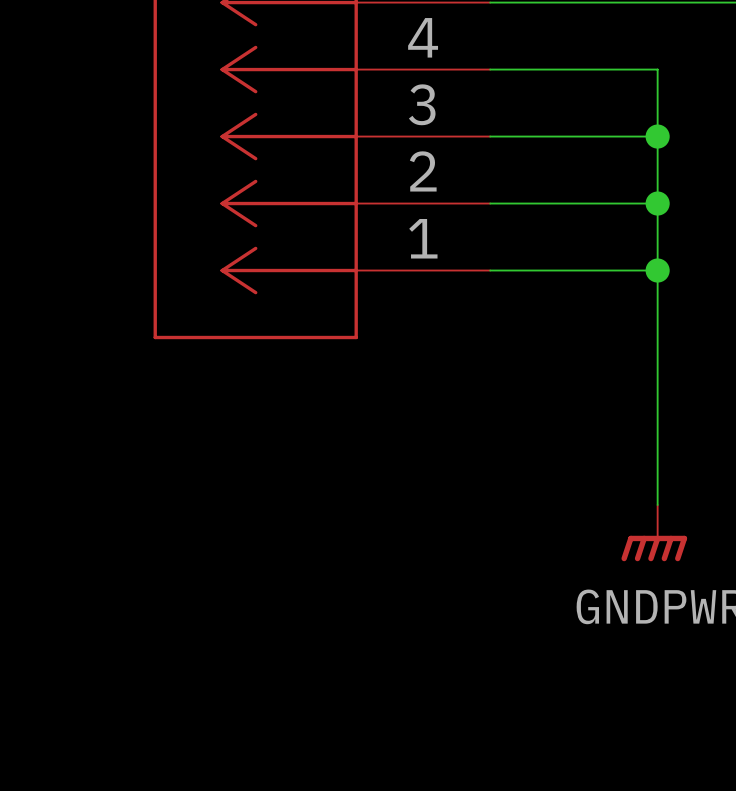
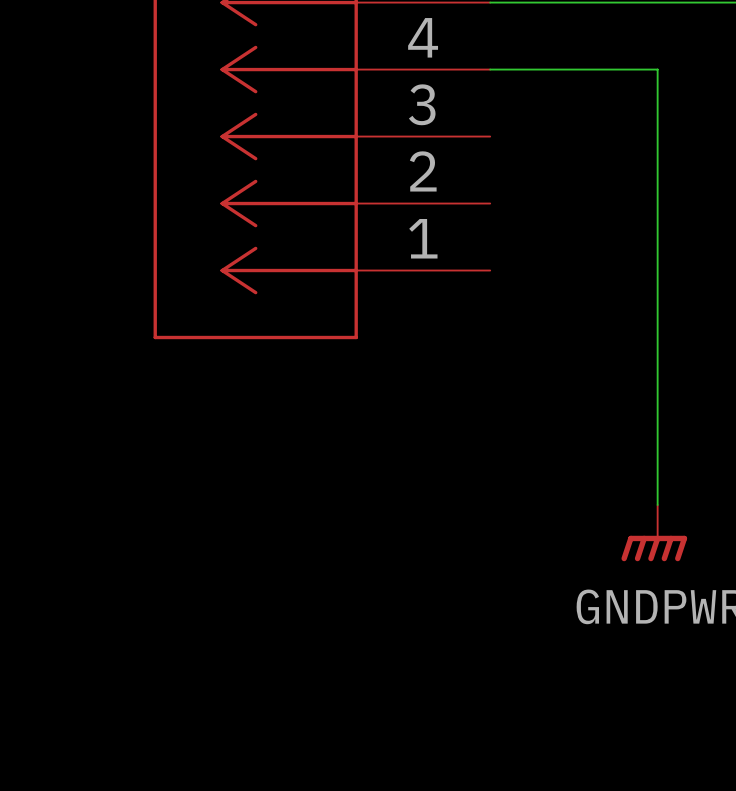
wire: (490, 136) (657, 136) -> none
junction: (657, 136) -> none
wire: (490, 203) (657, 203) -> none
junction: (657, 203) -> none
wire: (490, 270) (657, 270) -> none
junction: (657, 270) -> none

